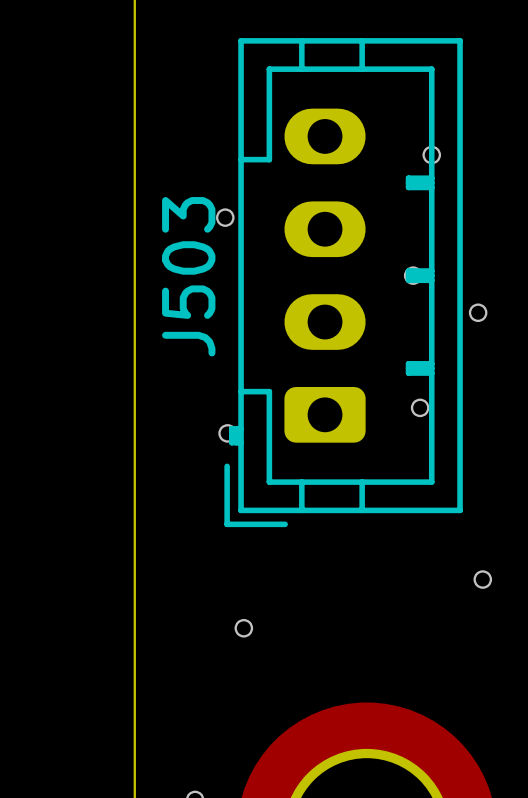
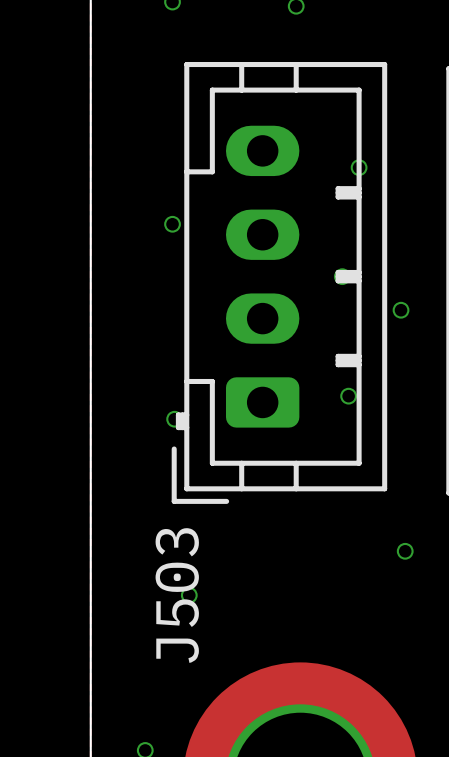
J503 name position: J503 (188, 276) -> J503 (177, 595)

